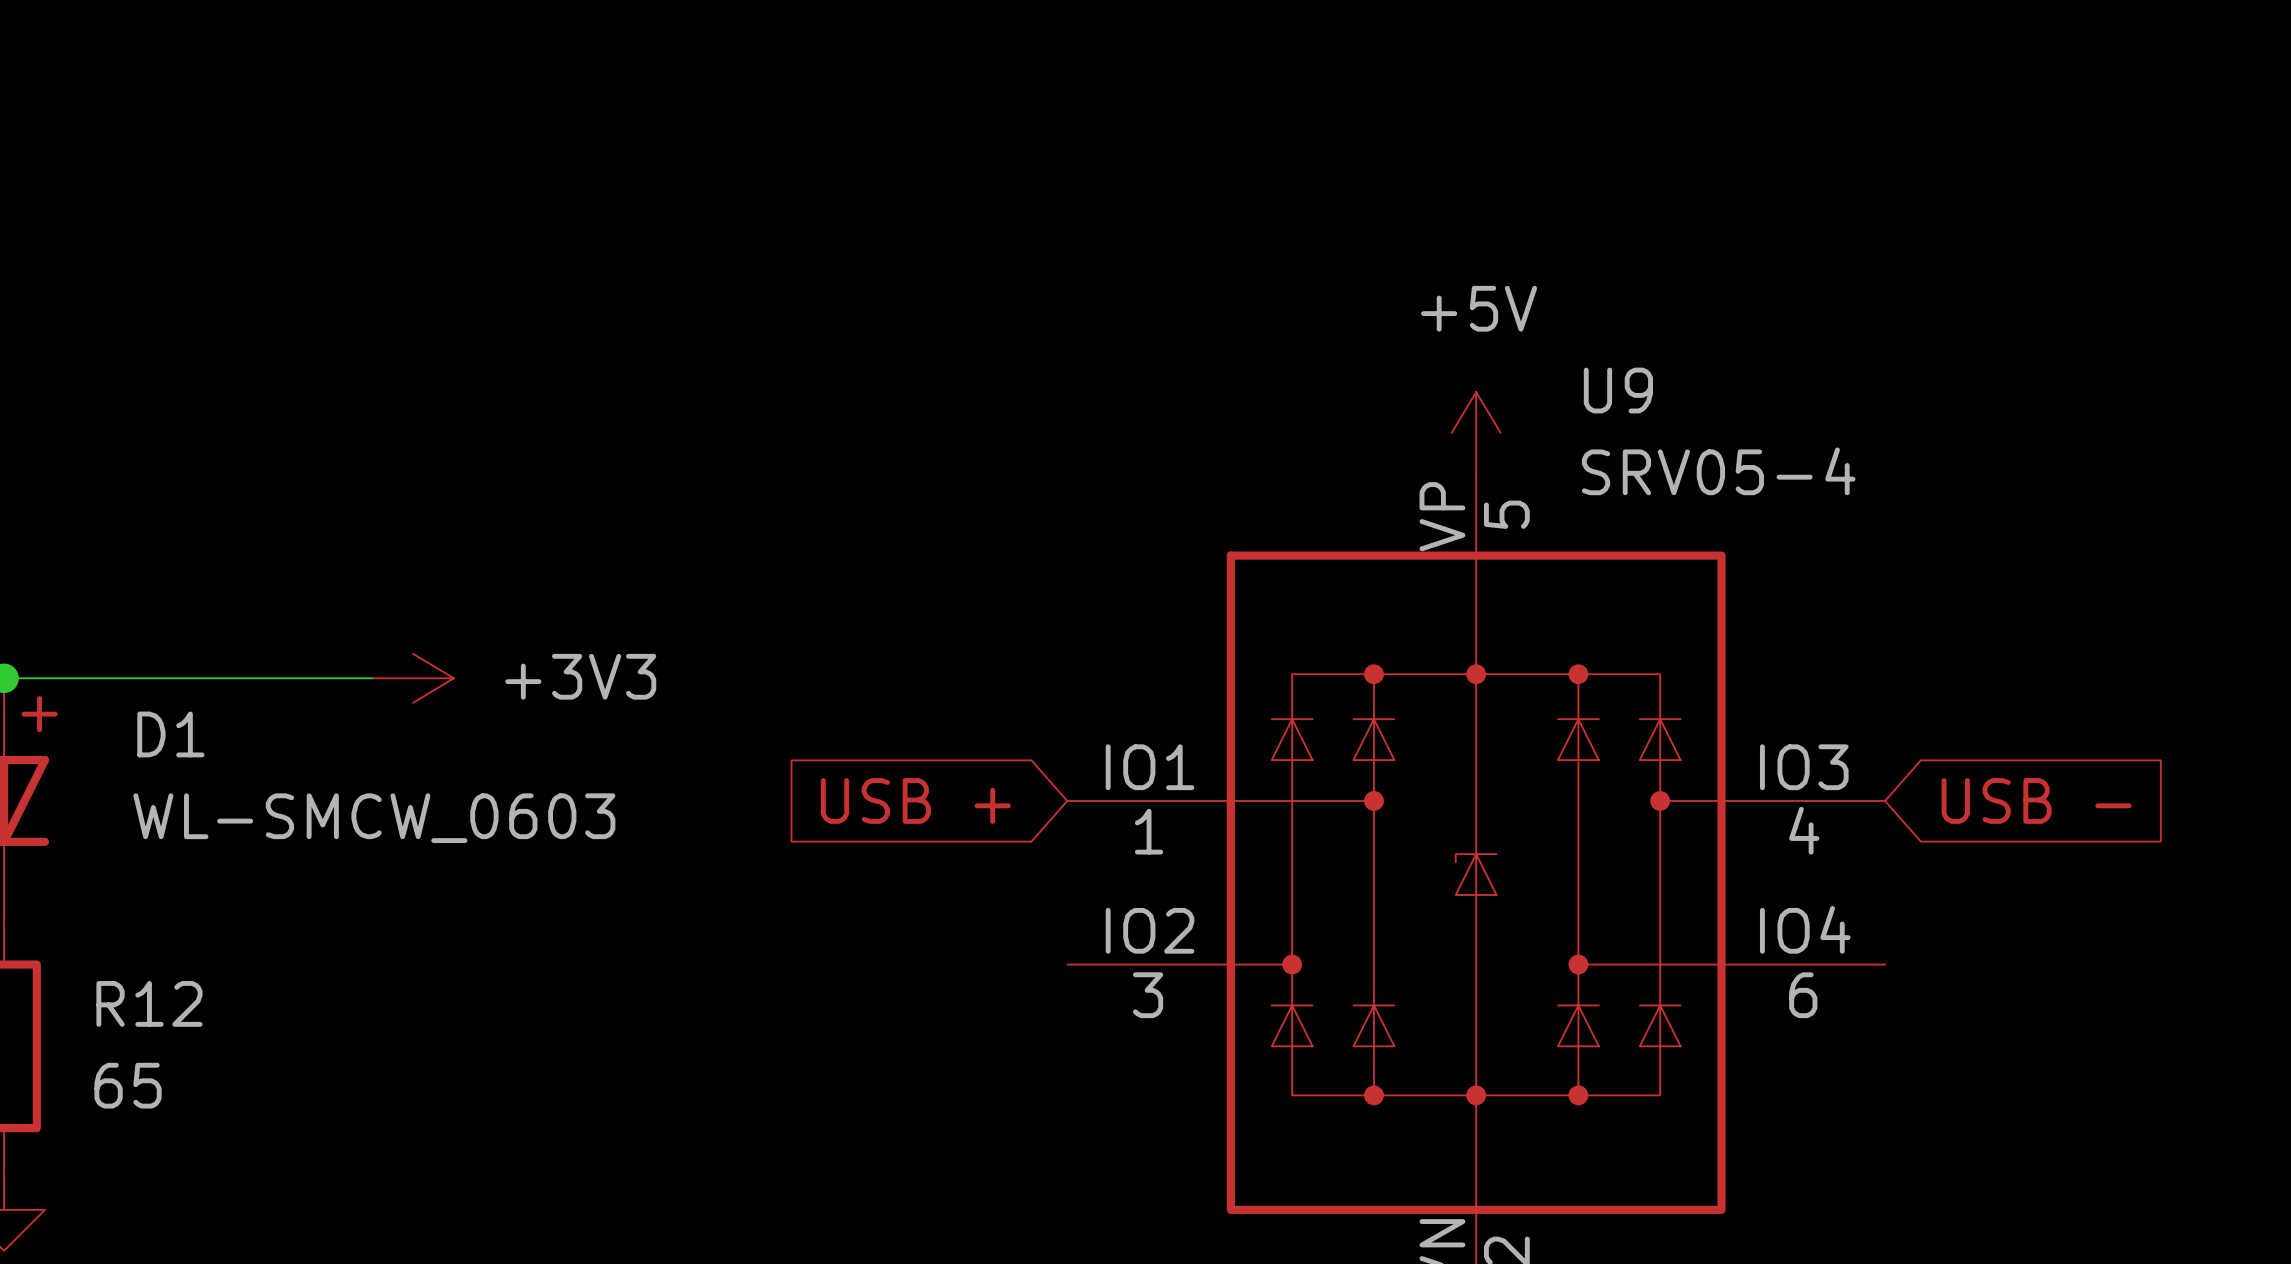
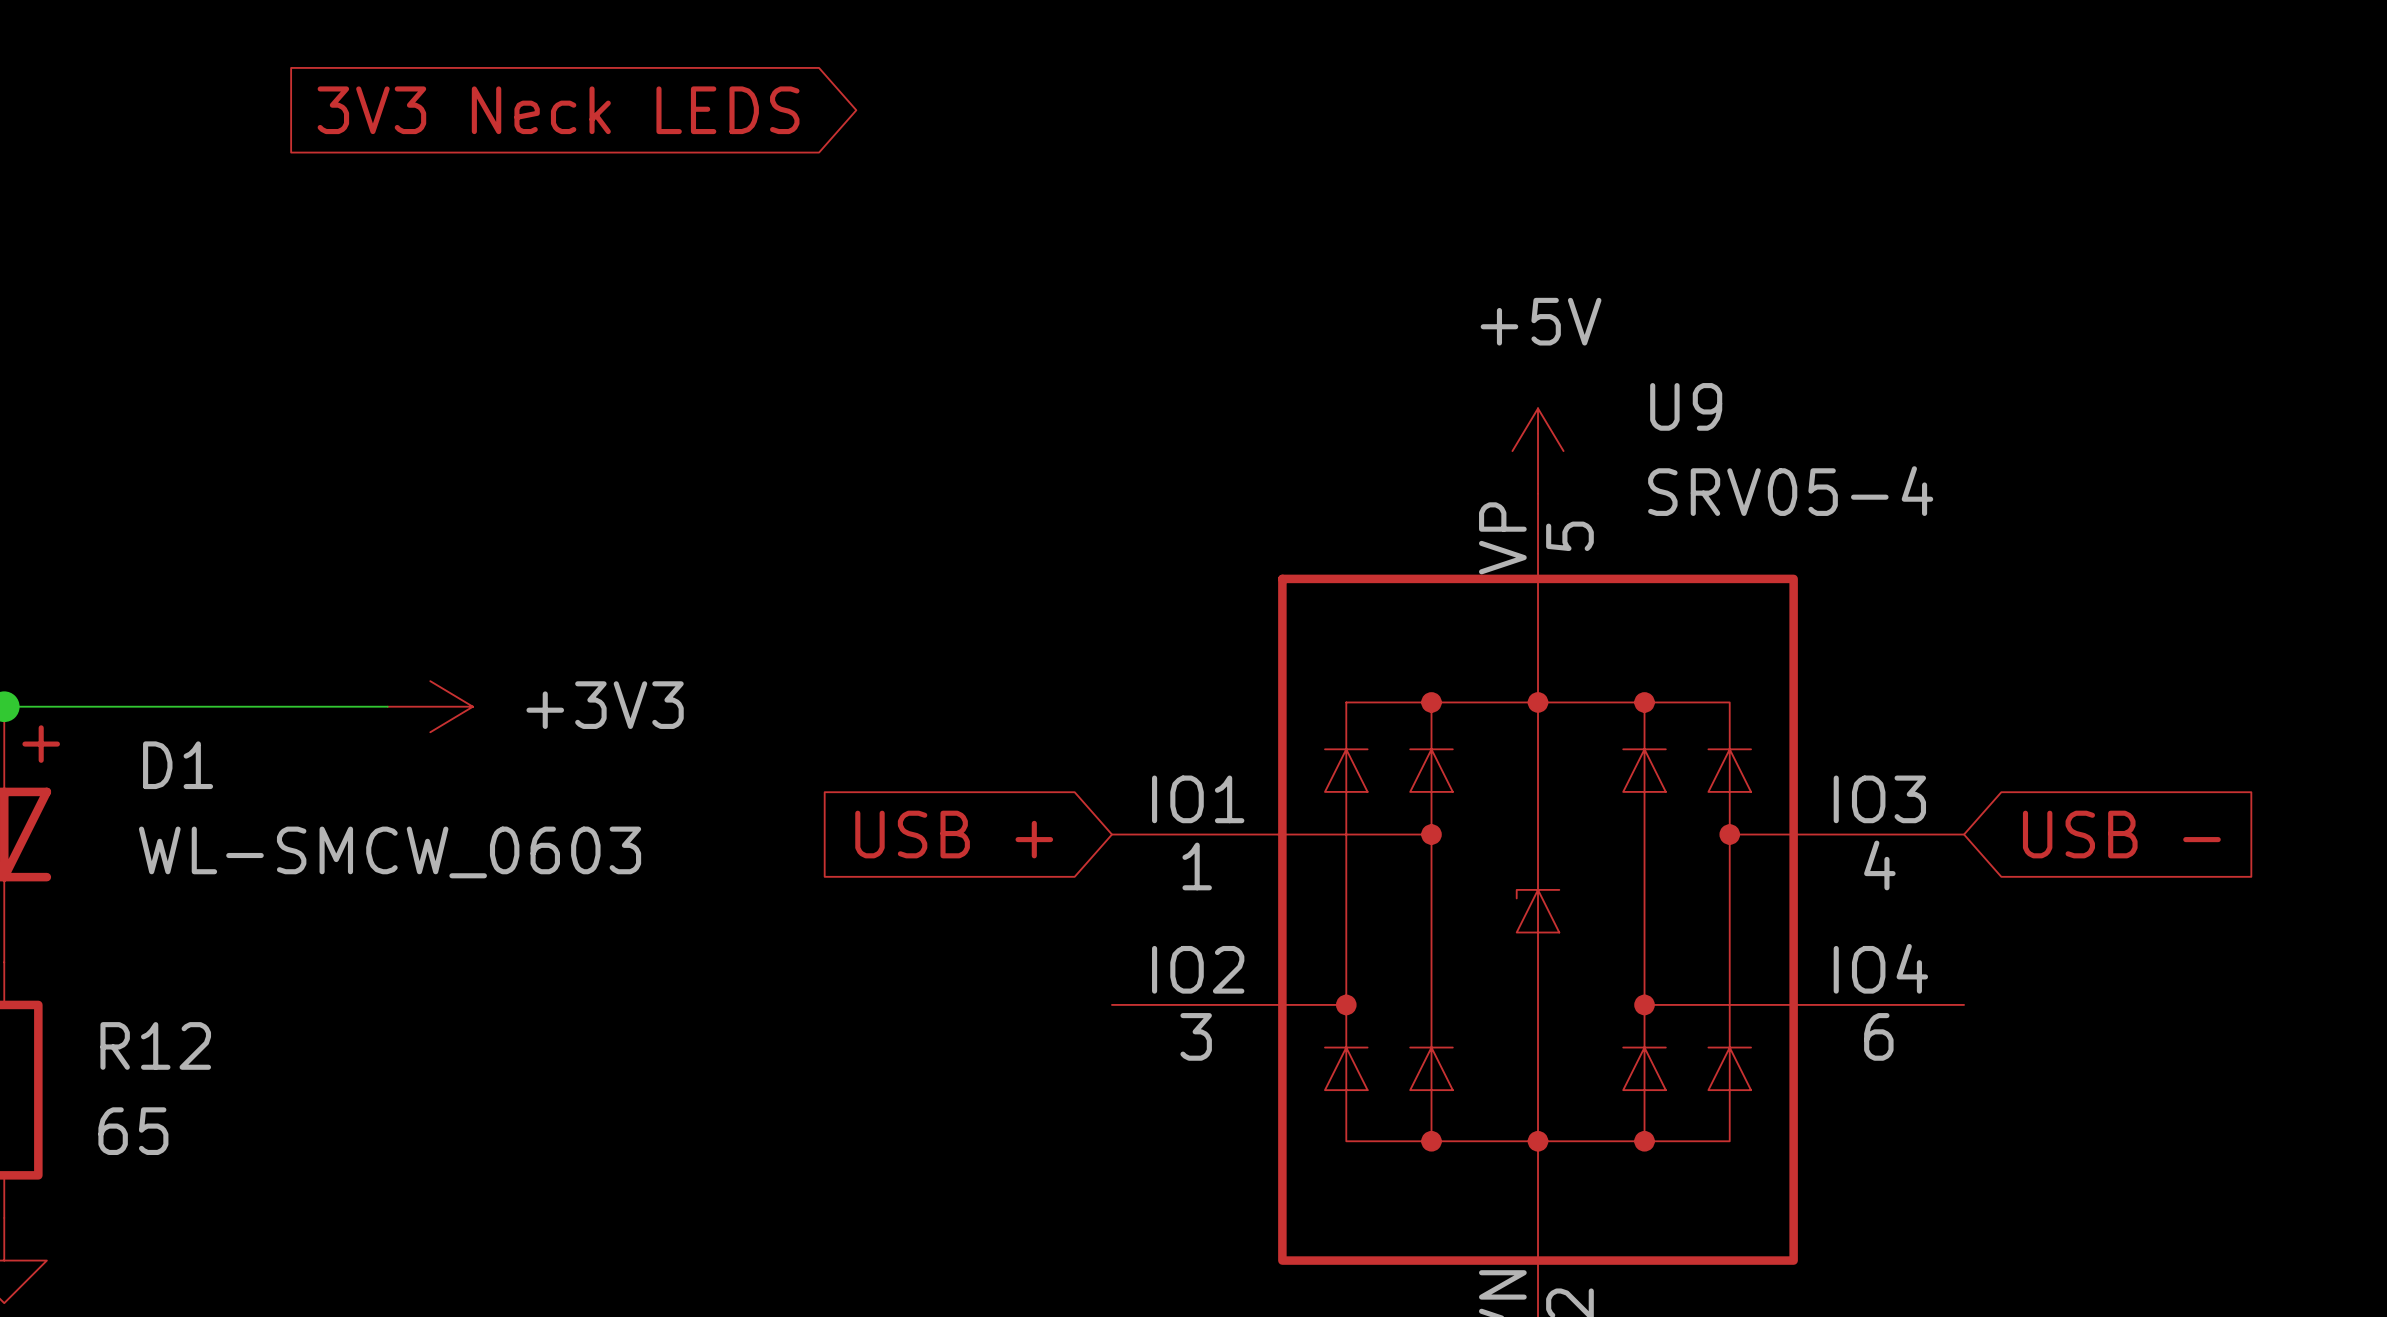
global label: none -> 3V3 Neck LEDS (558, 110)

